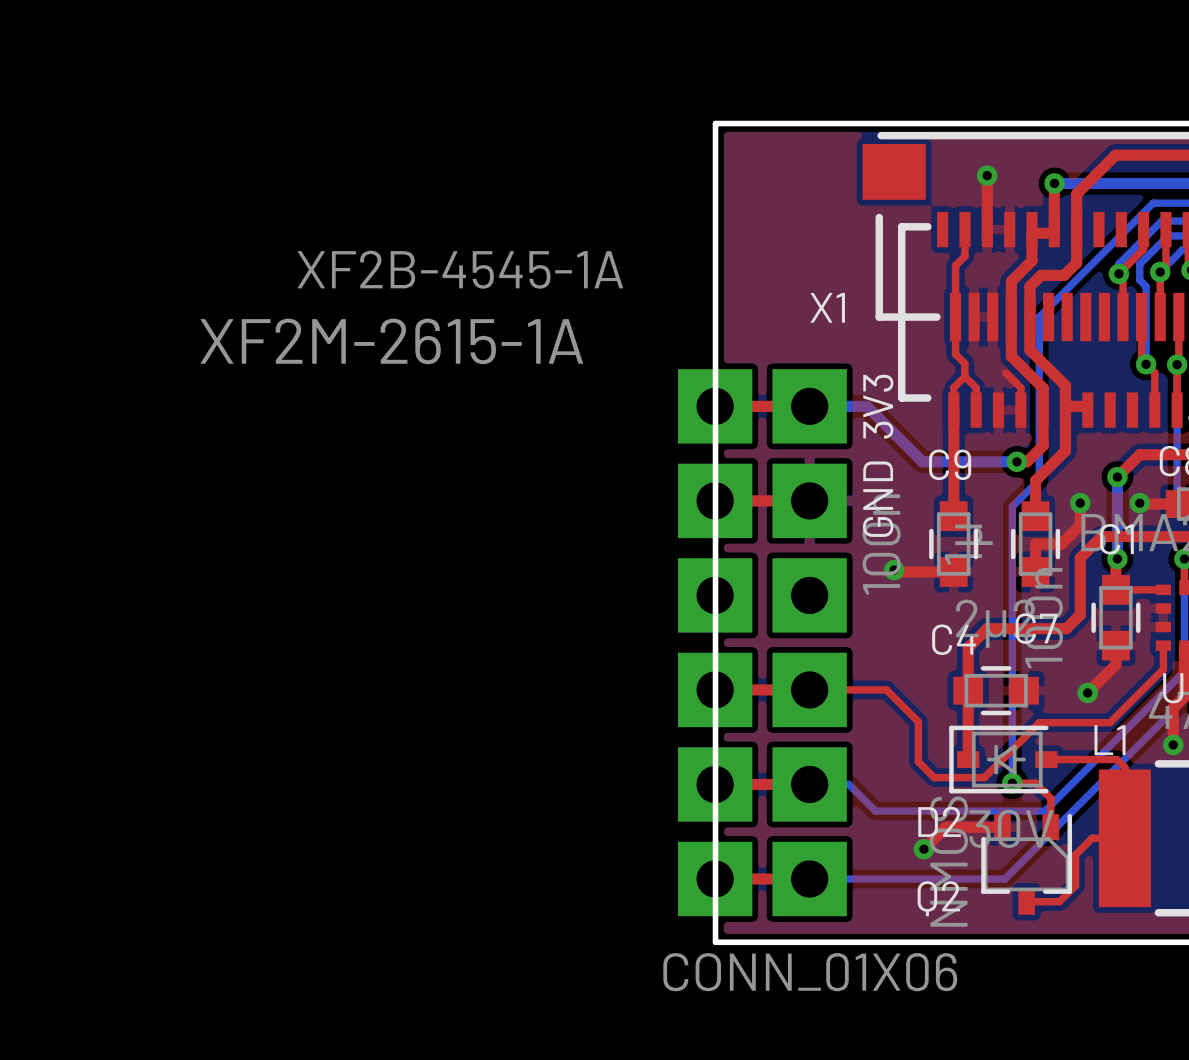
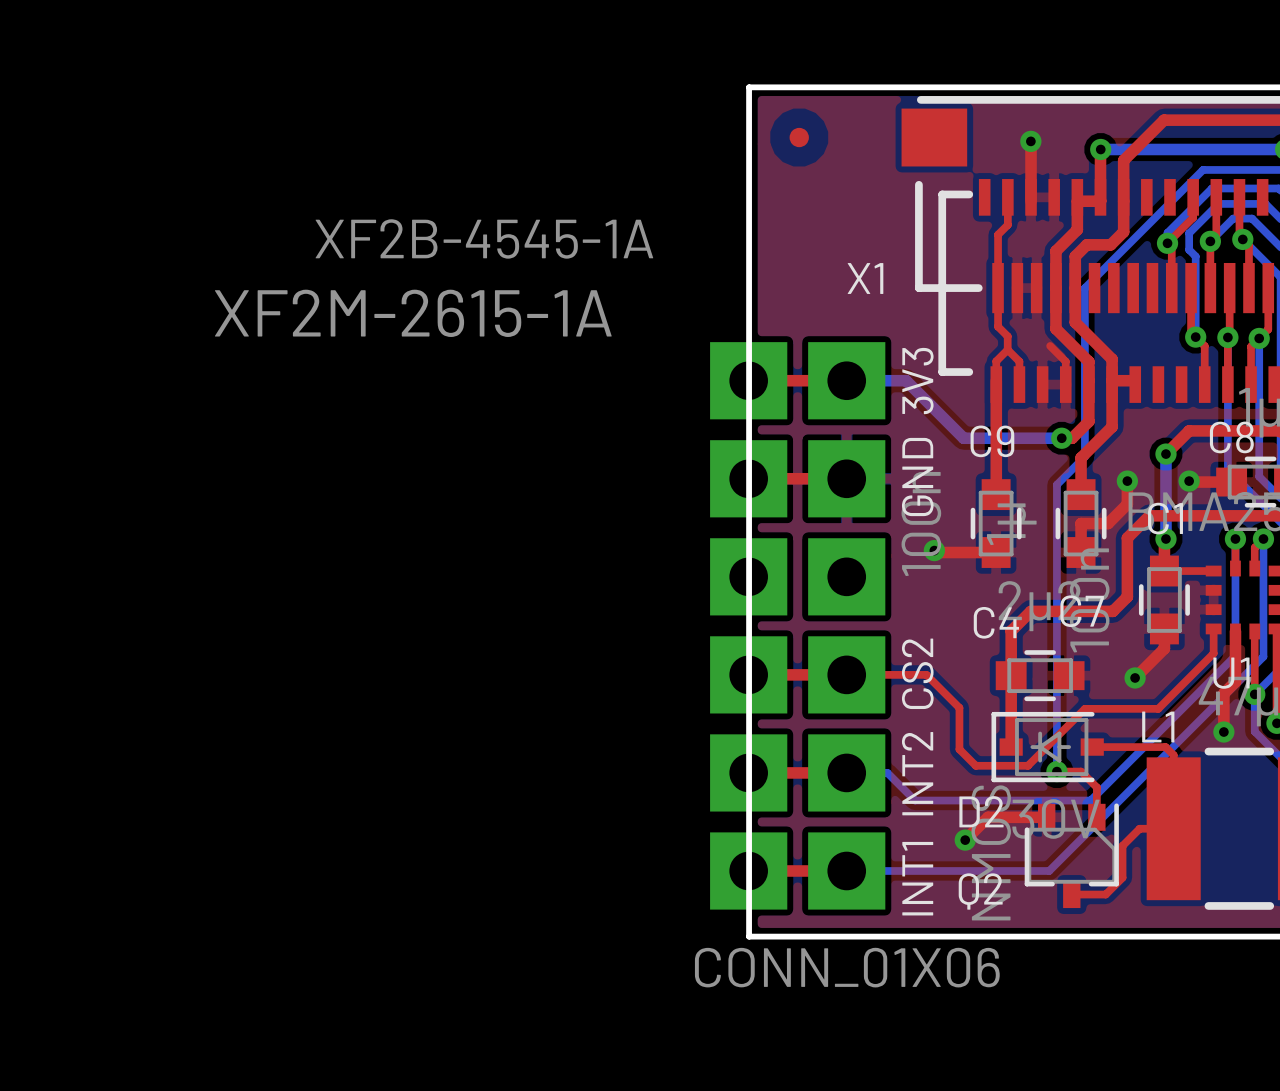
part: none -> (799, 137)
text: none -> CS2 (917, 673)
text: none -> INT2 (917, 773)
text: none -> INT1 (917, 878)

